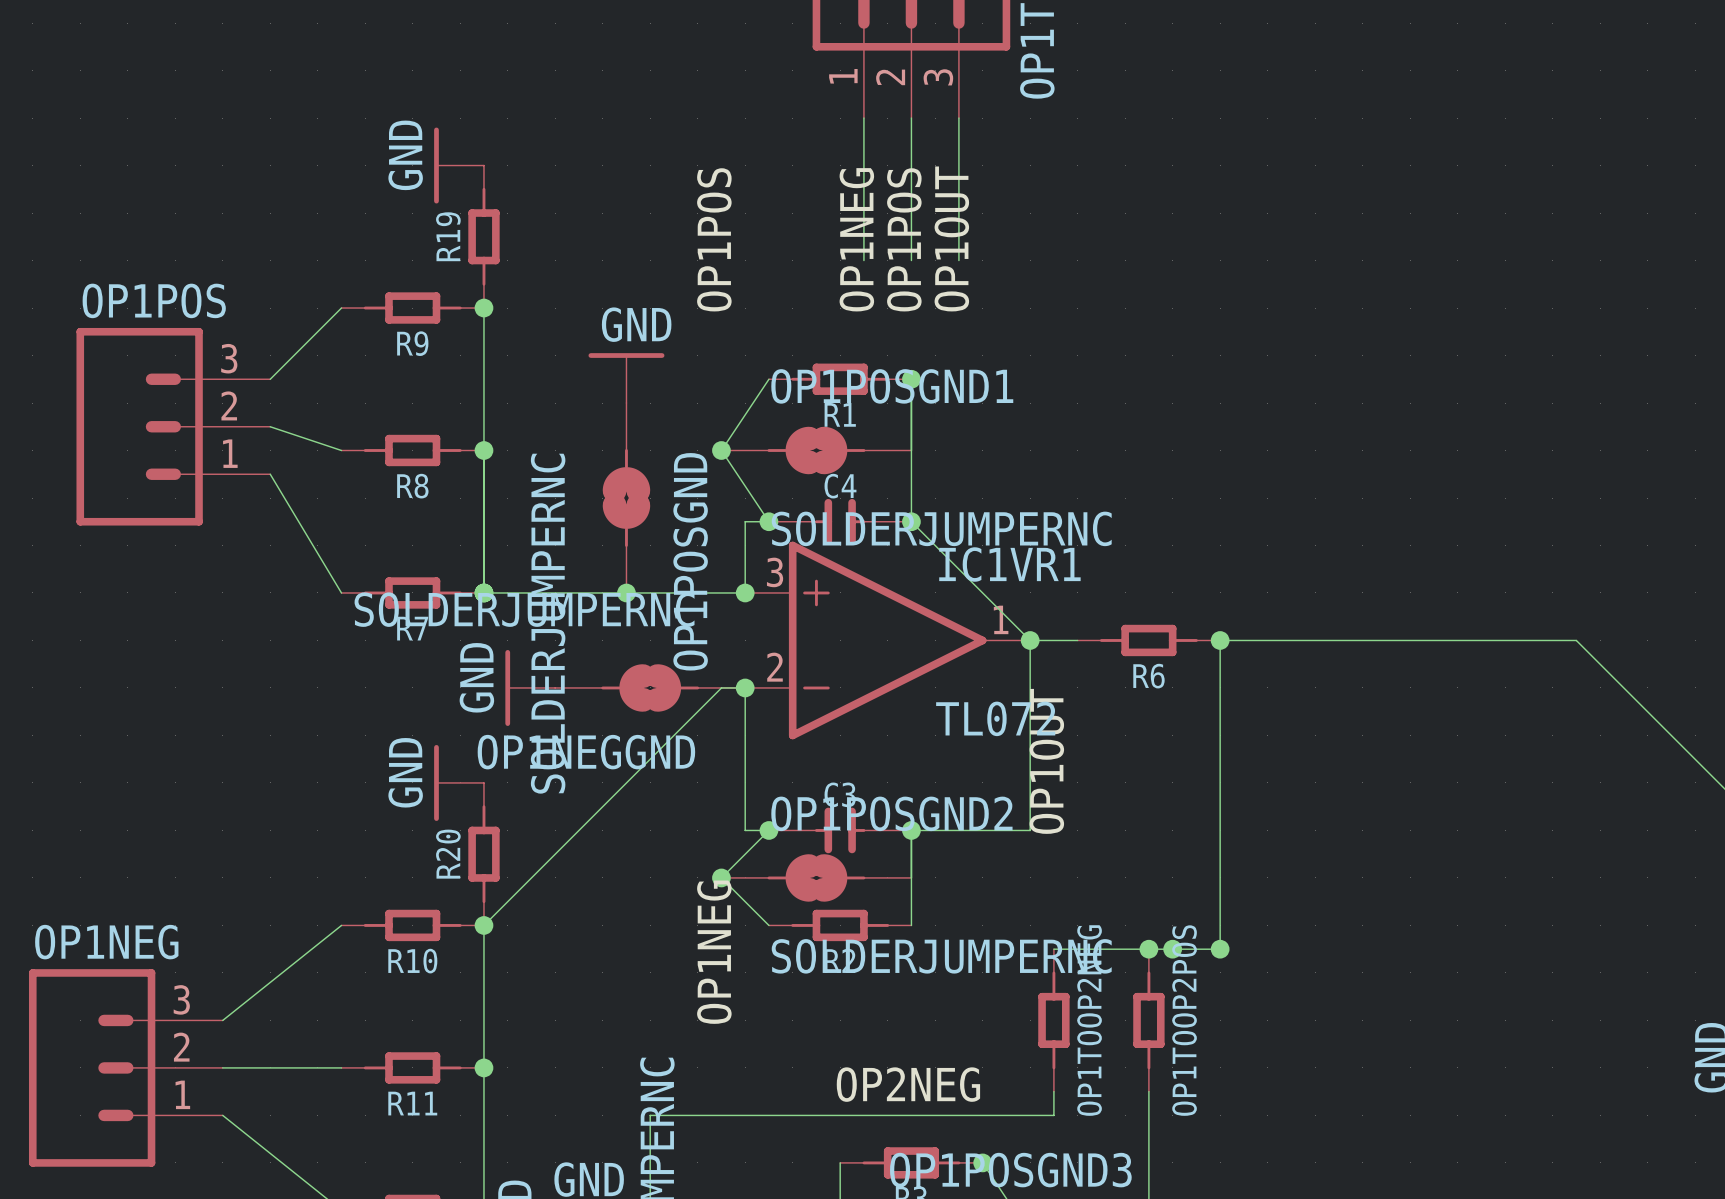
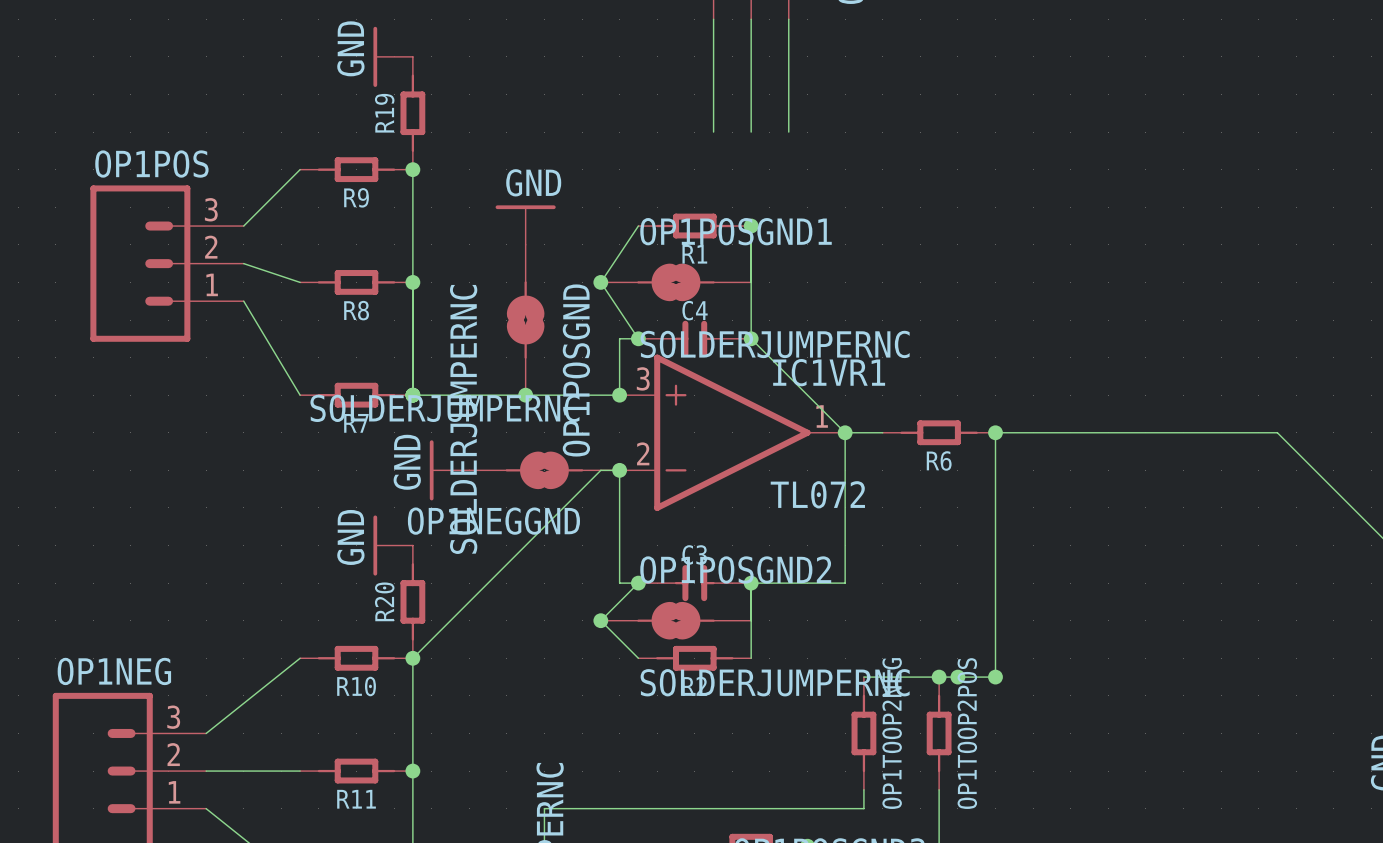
label: OP1OUT (951, 238) -> none
label: OP1POS (714, 239) -> none
label: OP1NEG (856, 239) -> none
label: OP1POS (904, 239) -> none
label: OP1OUT (1046, 761) -> none
label: OP1NEG (714, 952) -> none
label: OP2NEG (908, 1084) -> none

